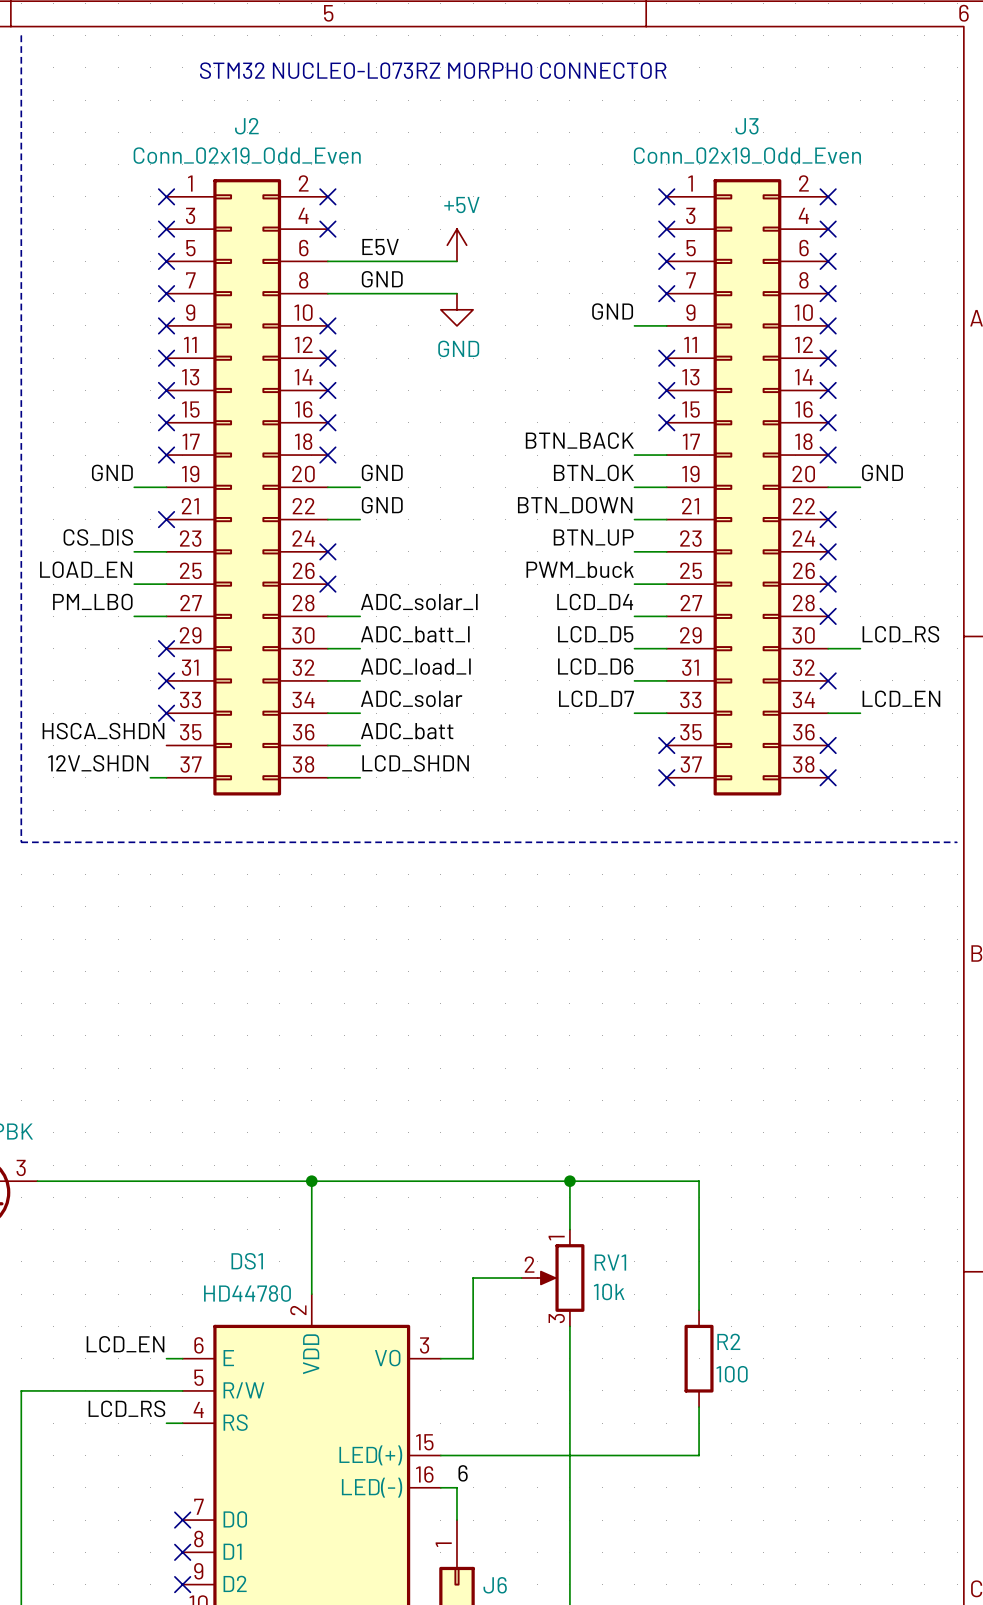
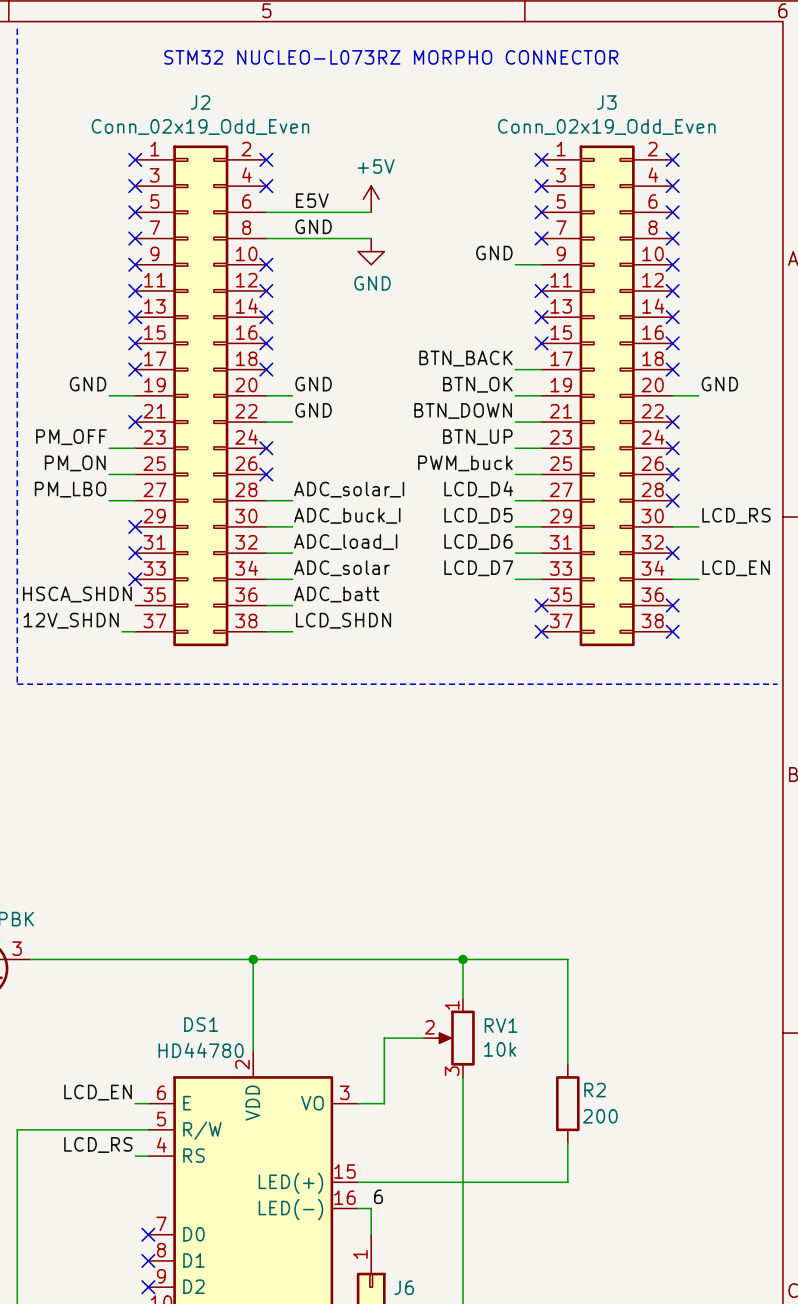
label: CS_DIS (98, 537) -> PM_OFF (71, 437)
label: LOAD_EN (86, 569) -> PM_ON (75, 463)
label: ADC_batt_I (415, 634) -> ADC_buck_I (347, 515)
R2 value: 100 (732, 1374) -> 200 (600, 1116)

